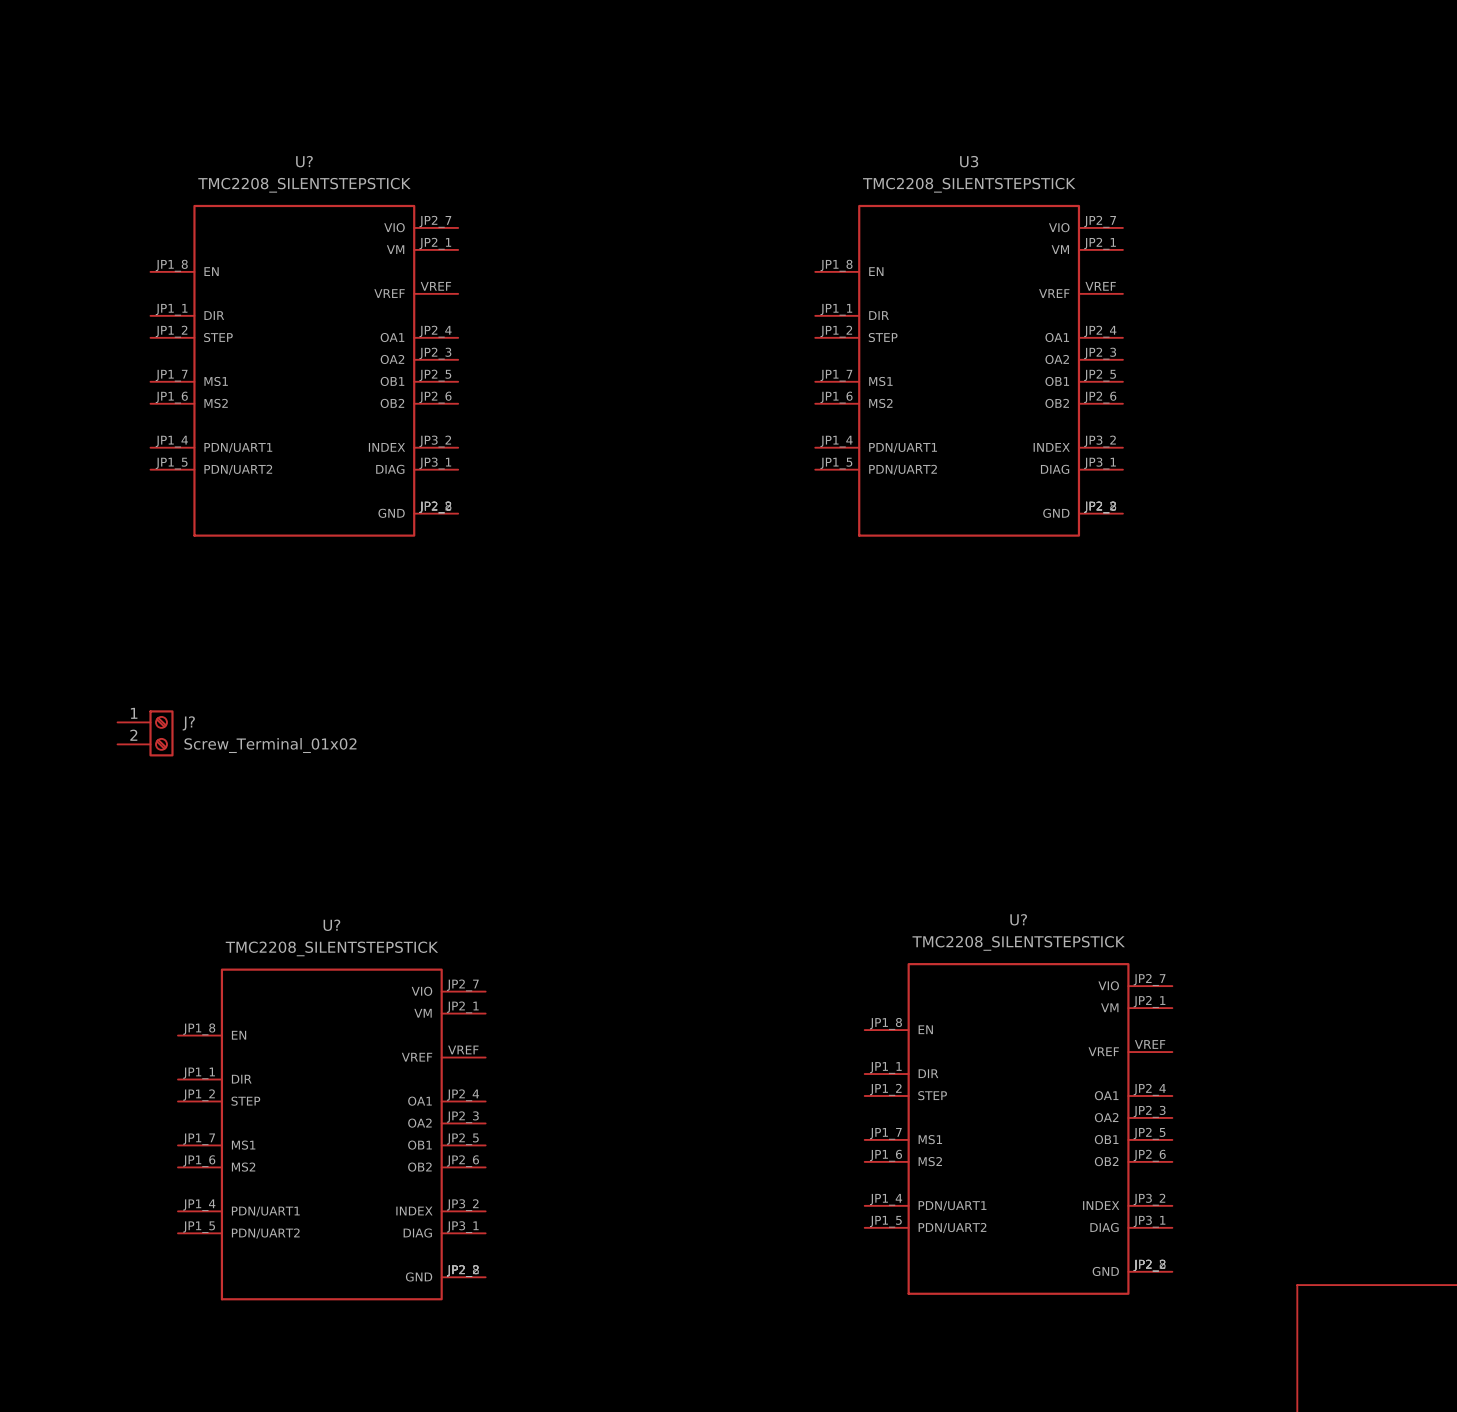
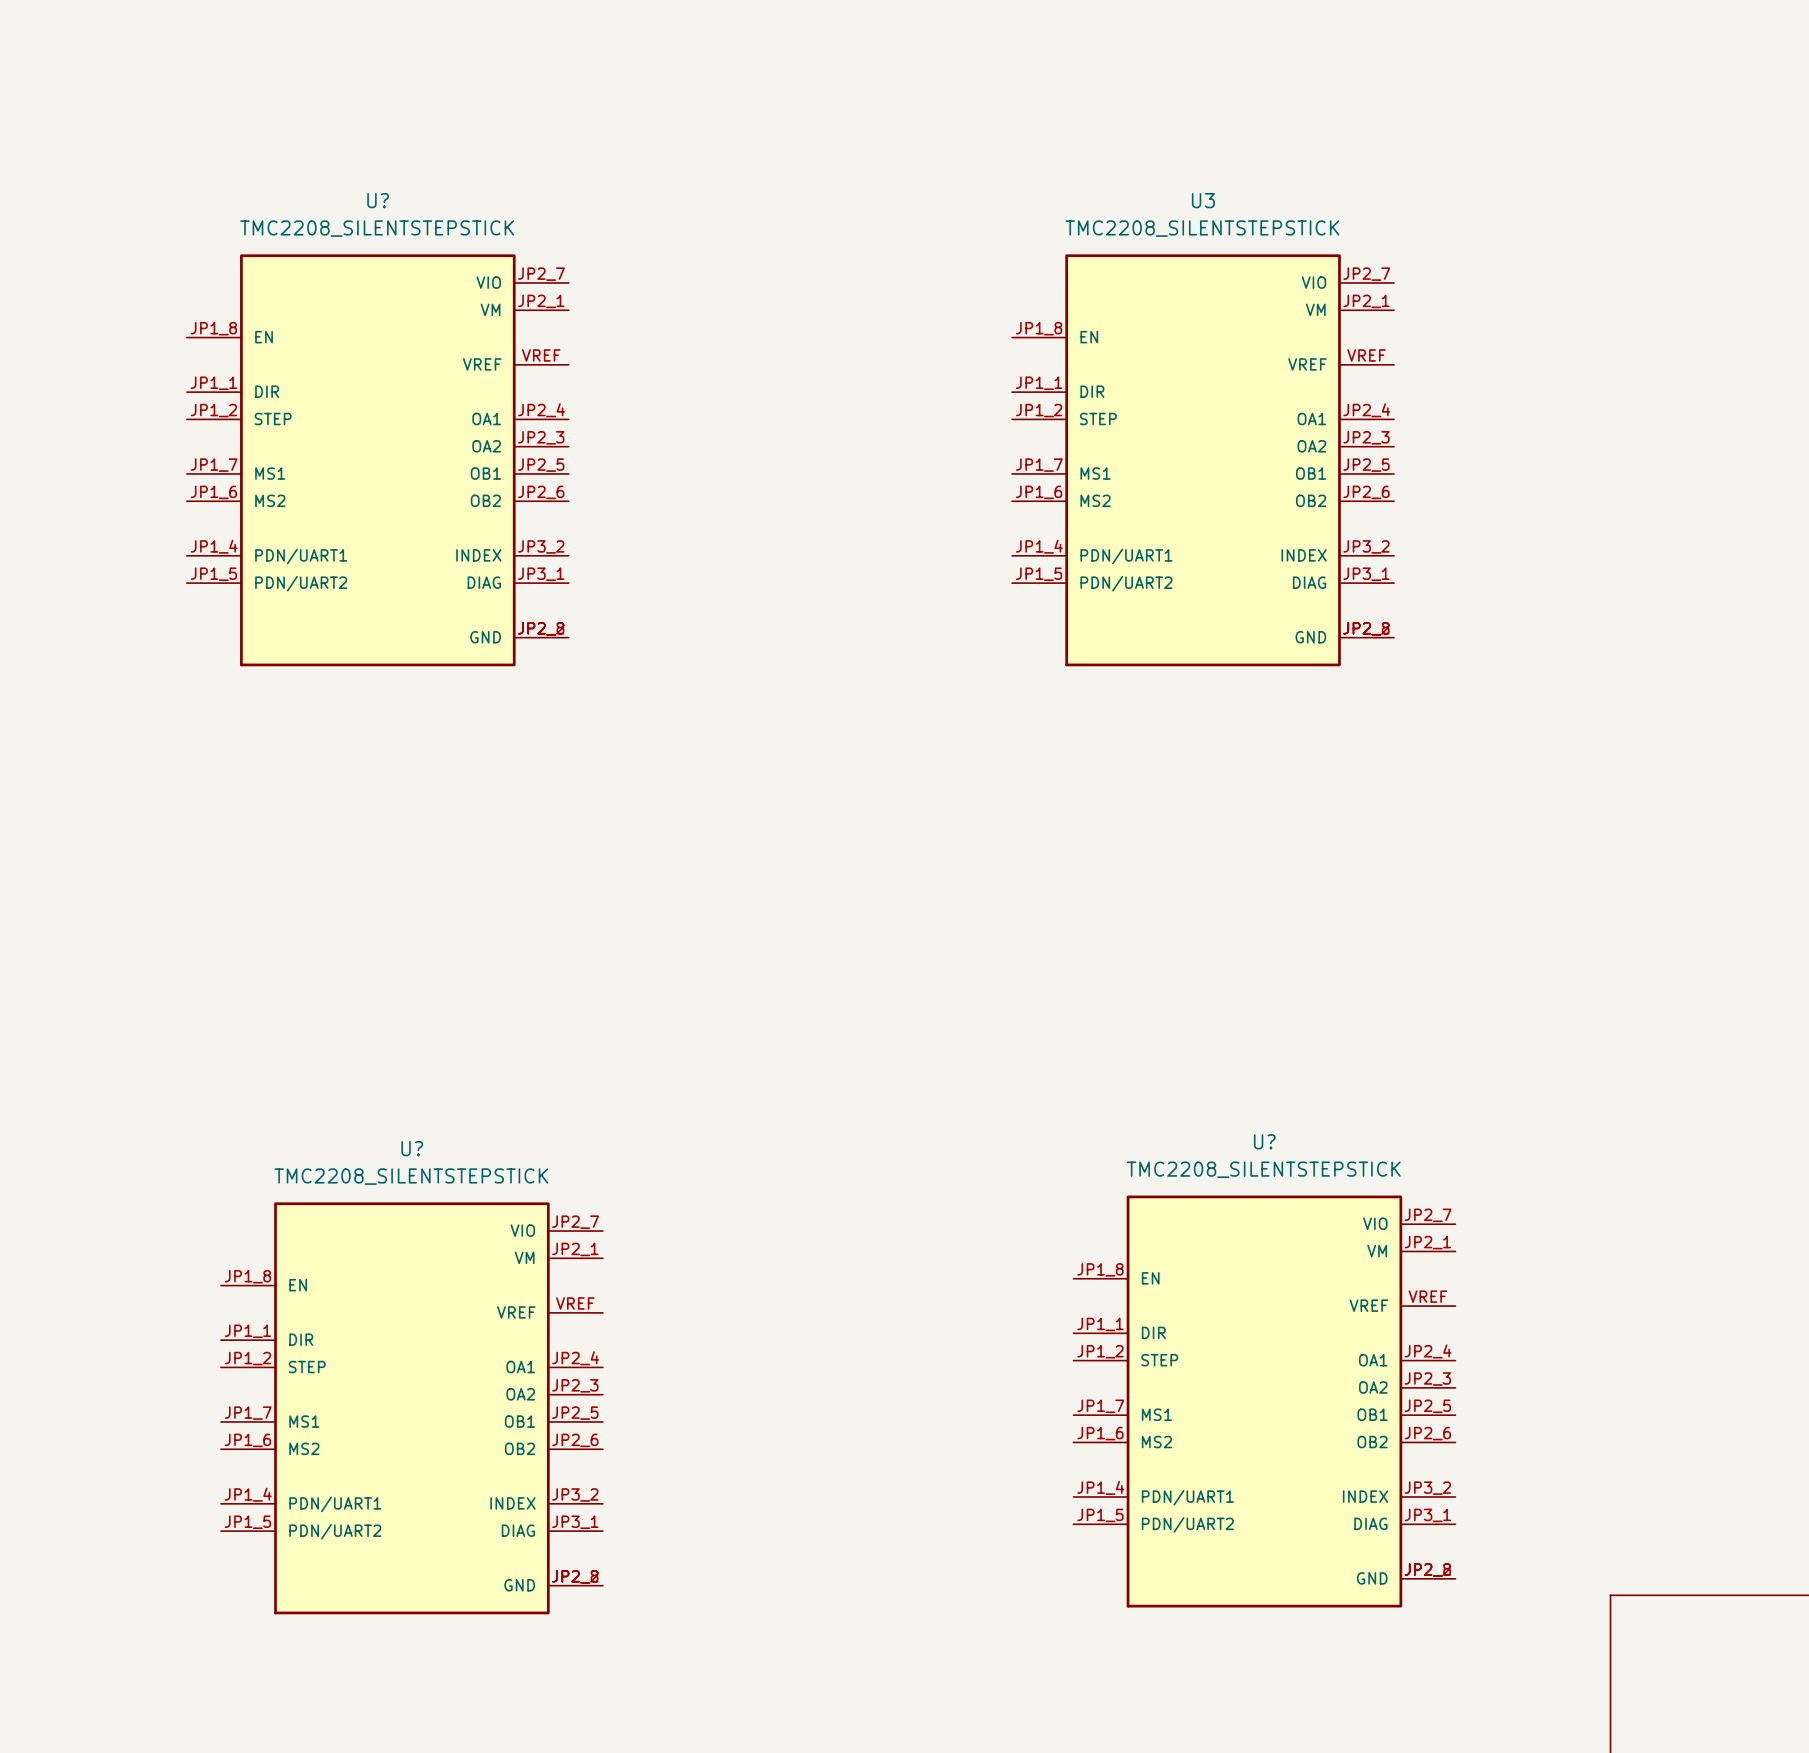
J?: Screw_Terminal_01x02 (145, 733) -> none

